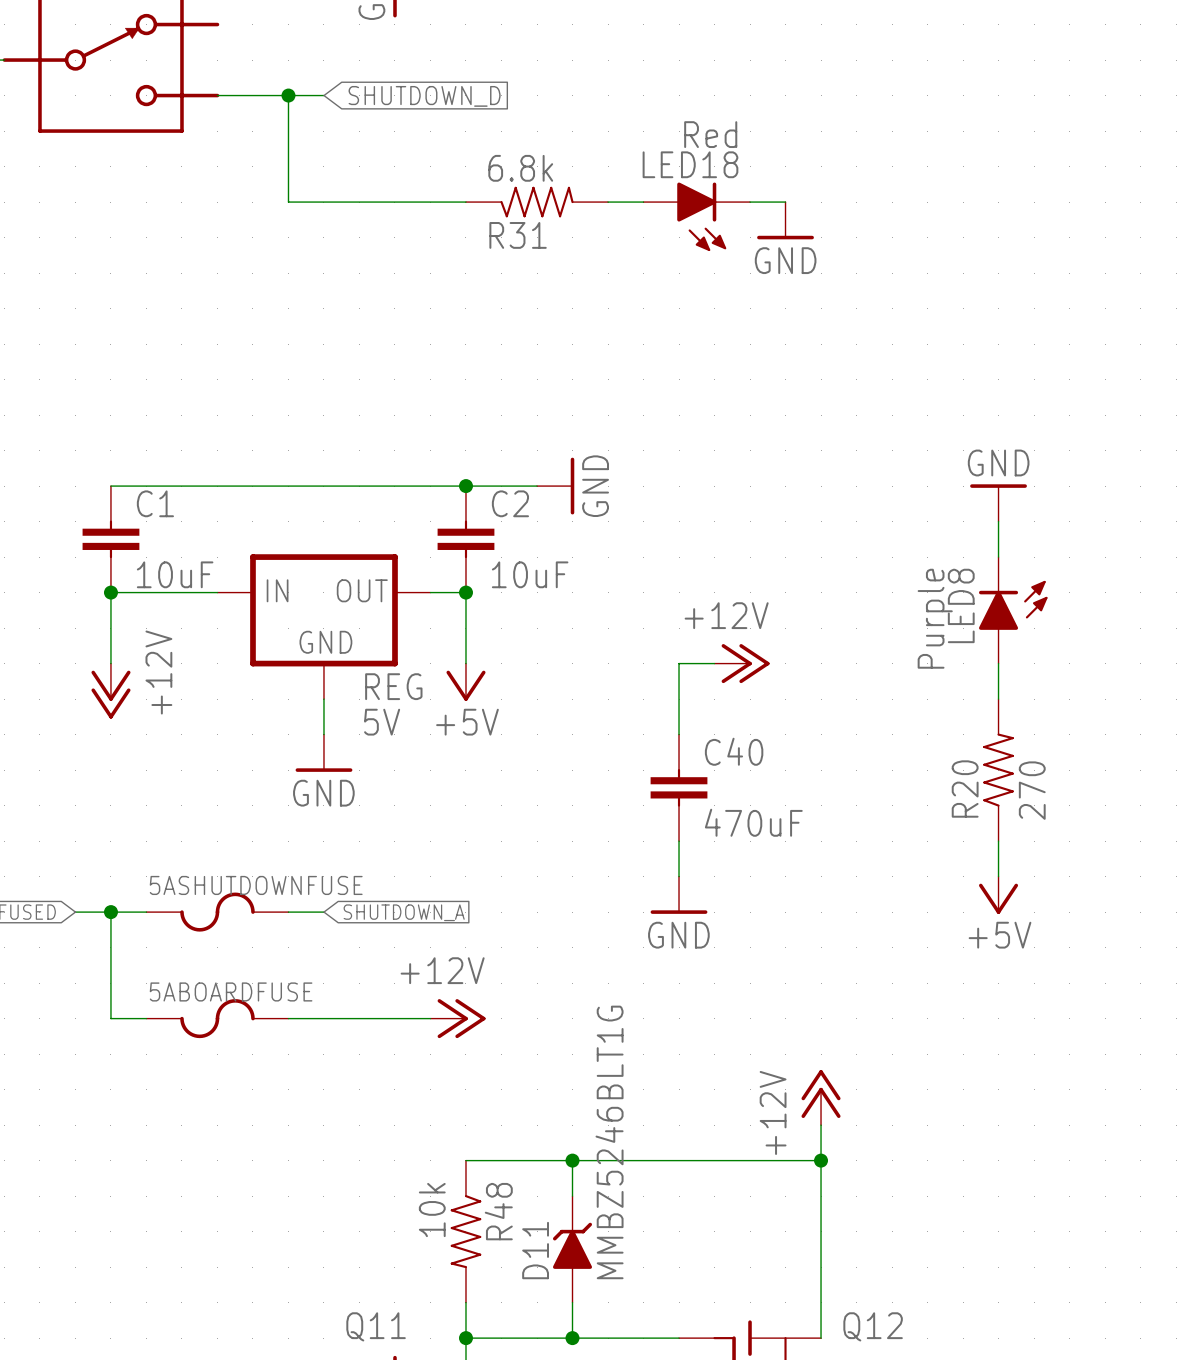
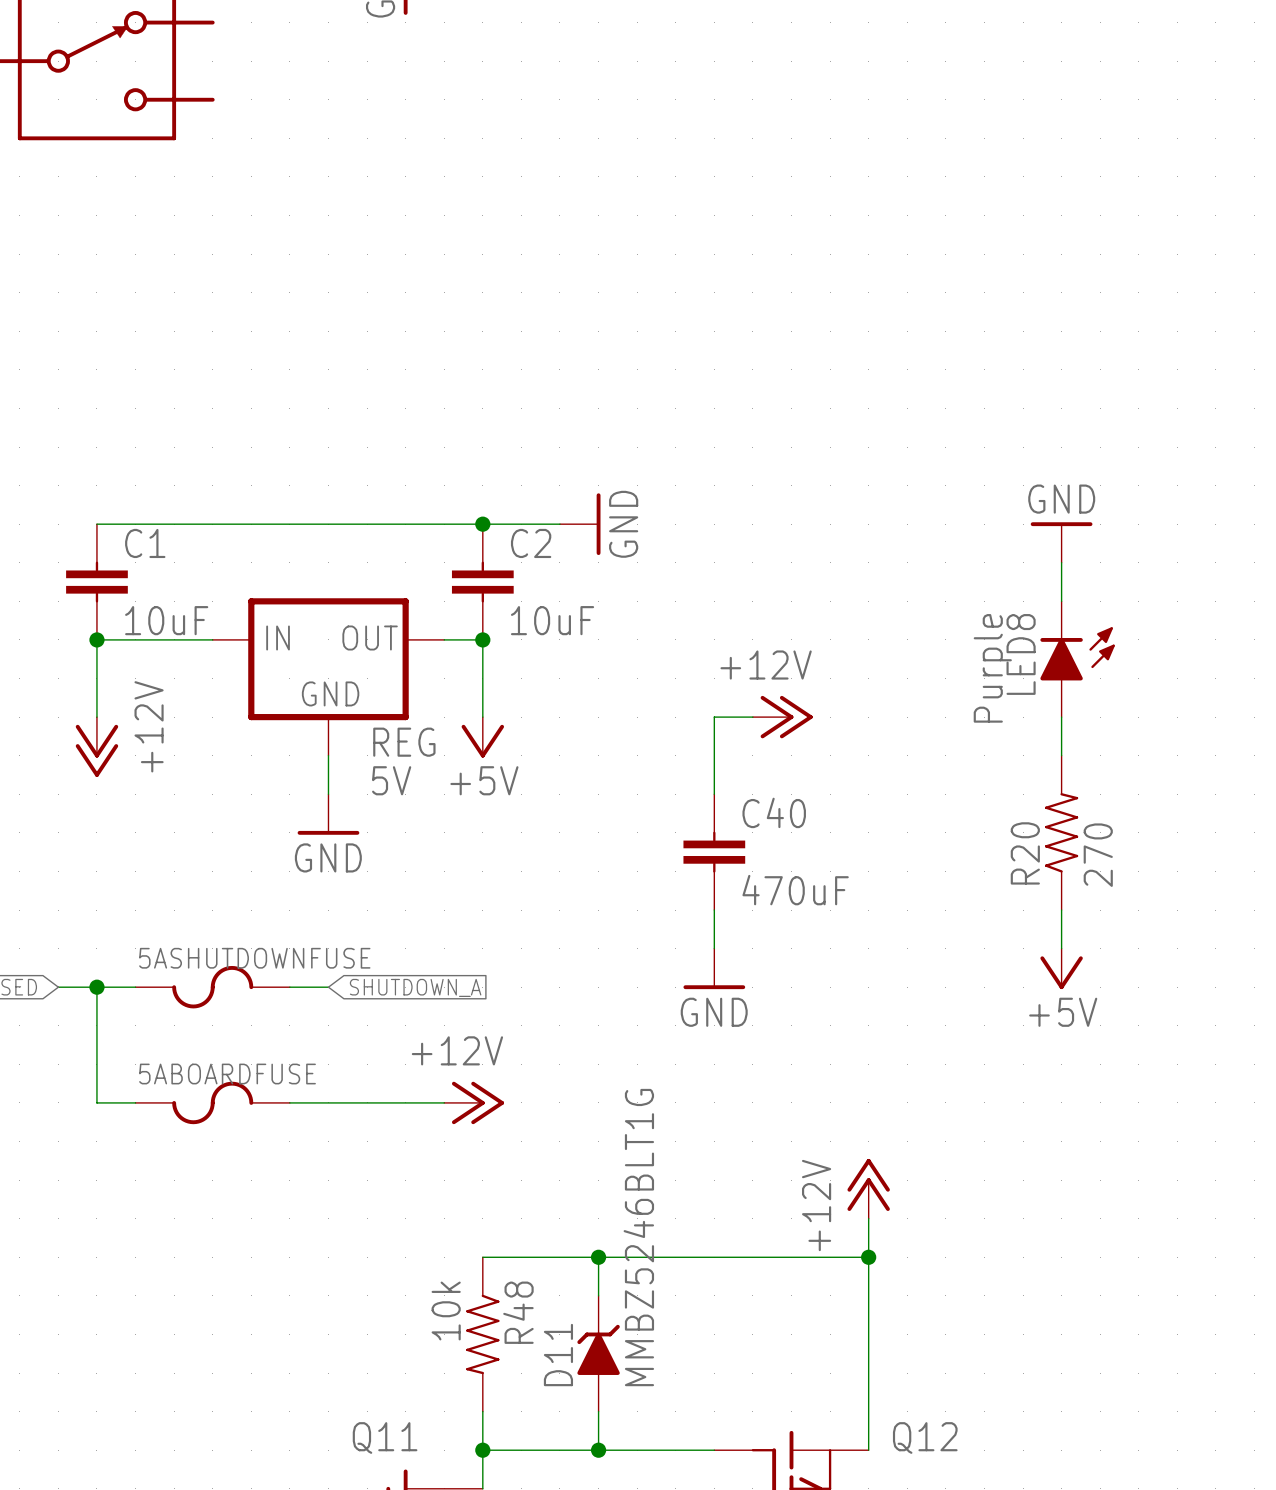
wire: (217, 95) (323, 95) -> none
wire: (288, 95) (288, 202) (465, 202) -> none
junction: (288, 95) -> none
global label: SHUTDOWN_D (424, 96) -> none
R31: 6.8k (537, 202) -> none
wire: (608, 202) (643, 202) -> none
wire: (750, 202) (785, 202) -> none
LED18: Red (696, 216) -> none
power symbol: GND (785, 220) -> none

